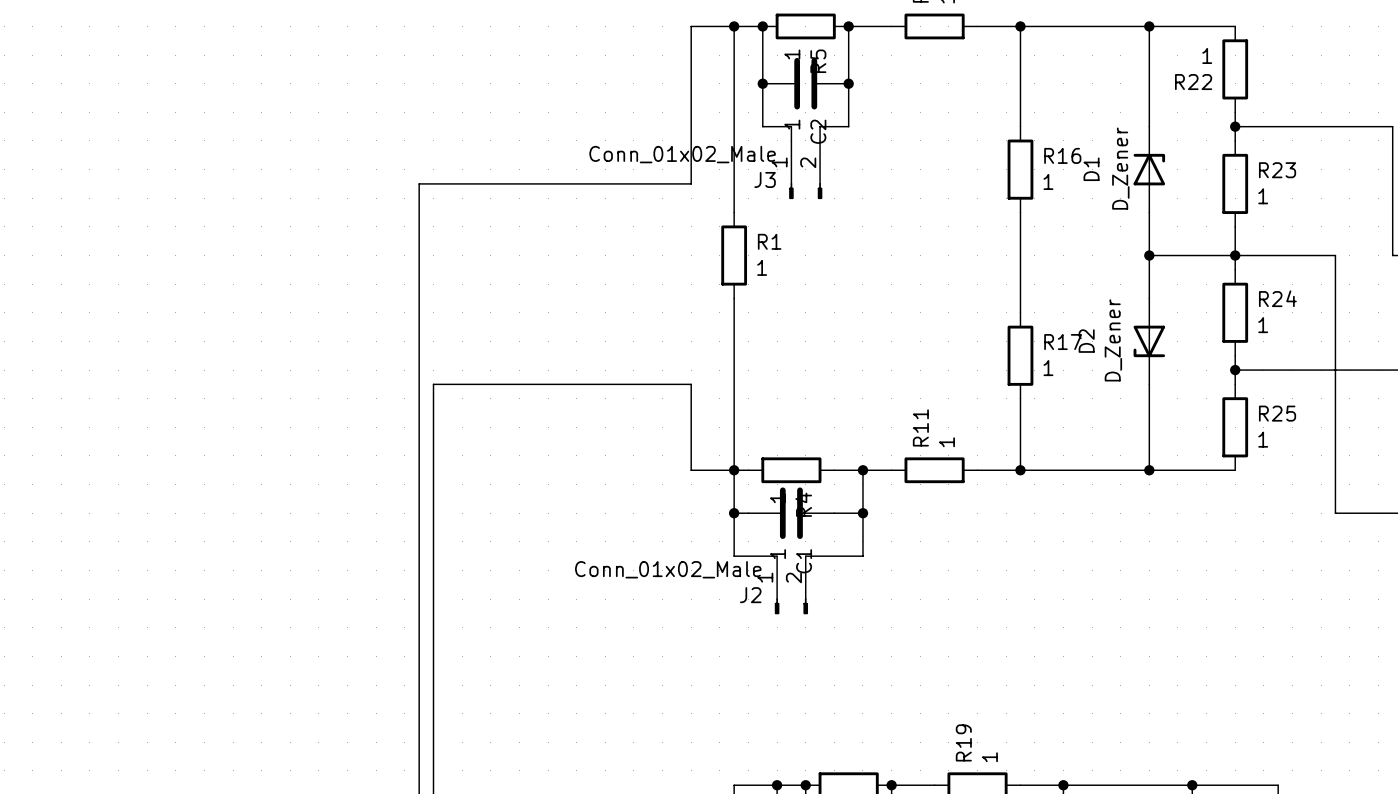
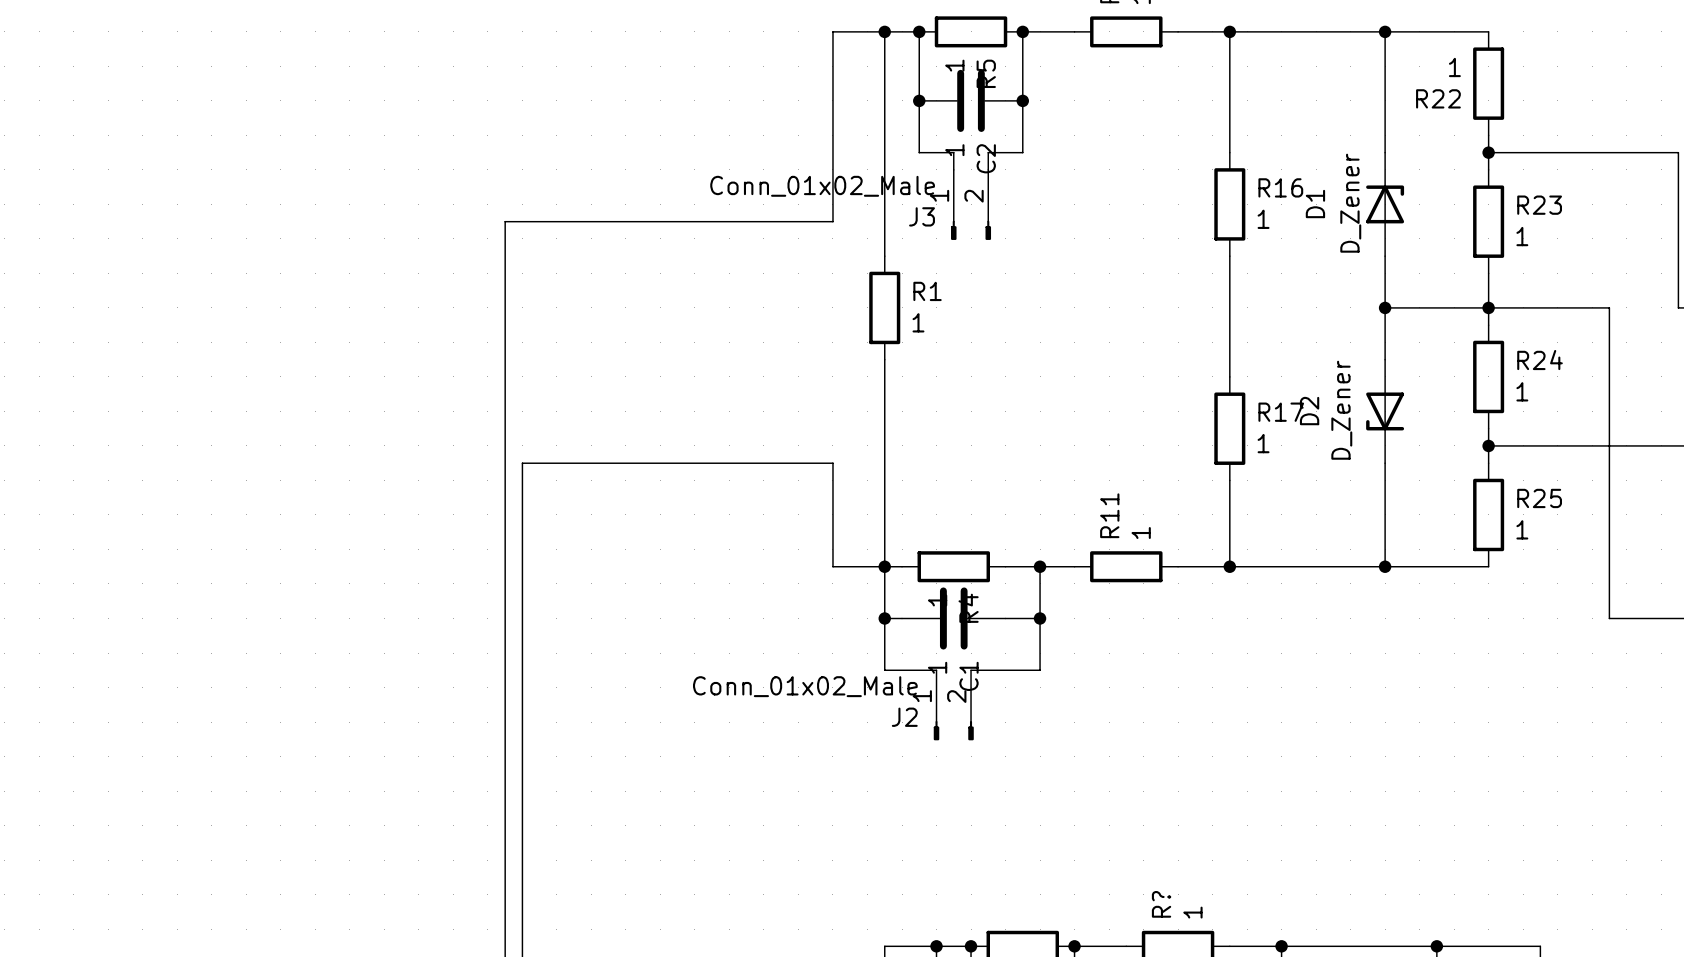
R19 name: R19 (963, 742) -> R? (1161, 904)

